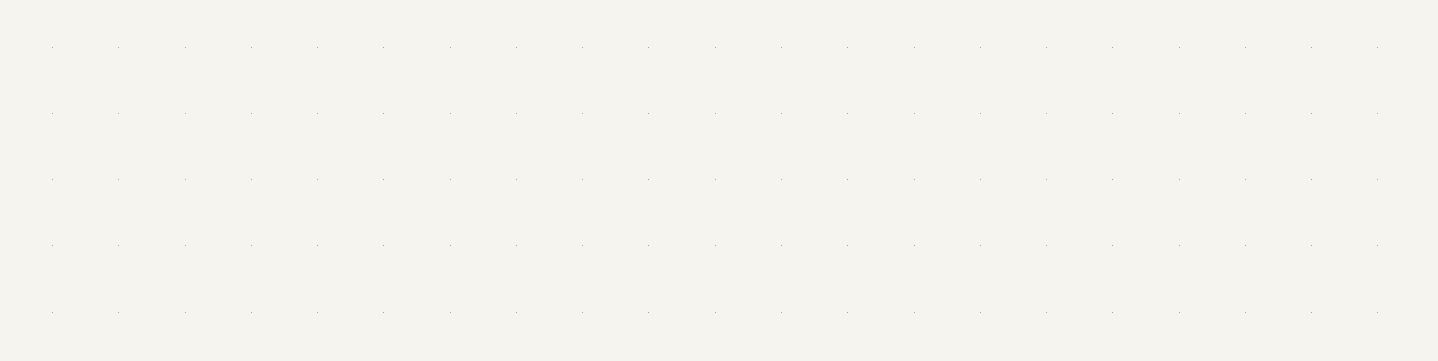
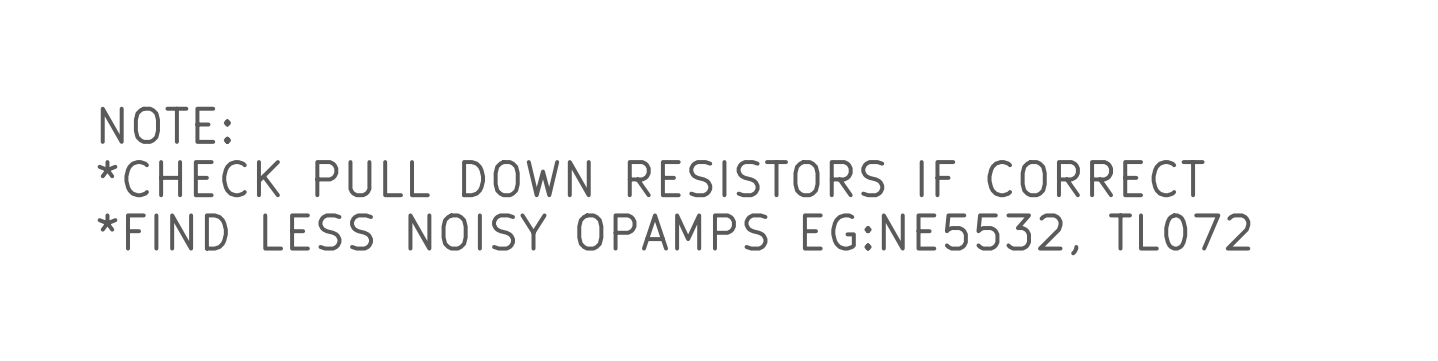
text: none -> NOTE: (165, 125)
text: none -> *CHECK PULL DOWN RESISTORS IF CORRECT (651, 178)
text: none -> *FIND LESS NOISY OPAMPS EG:NE5532, TL072 (673, 234)

